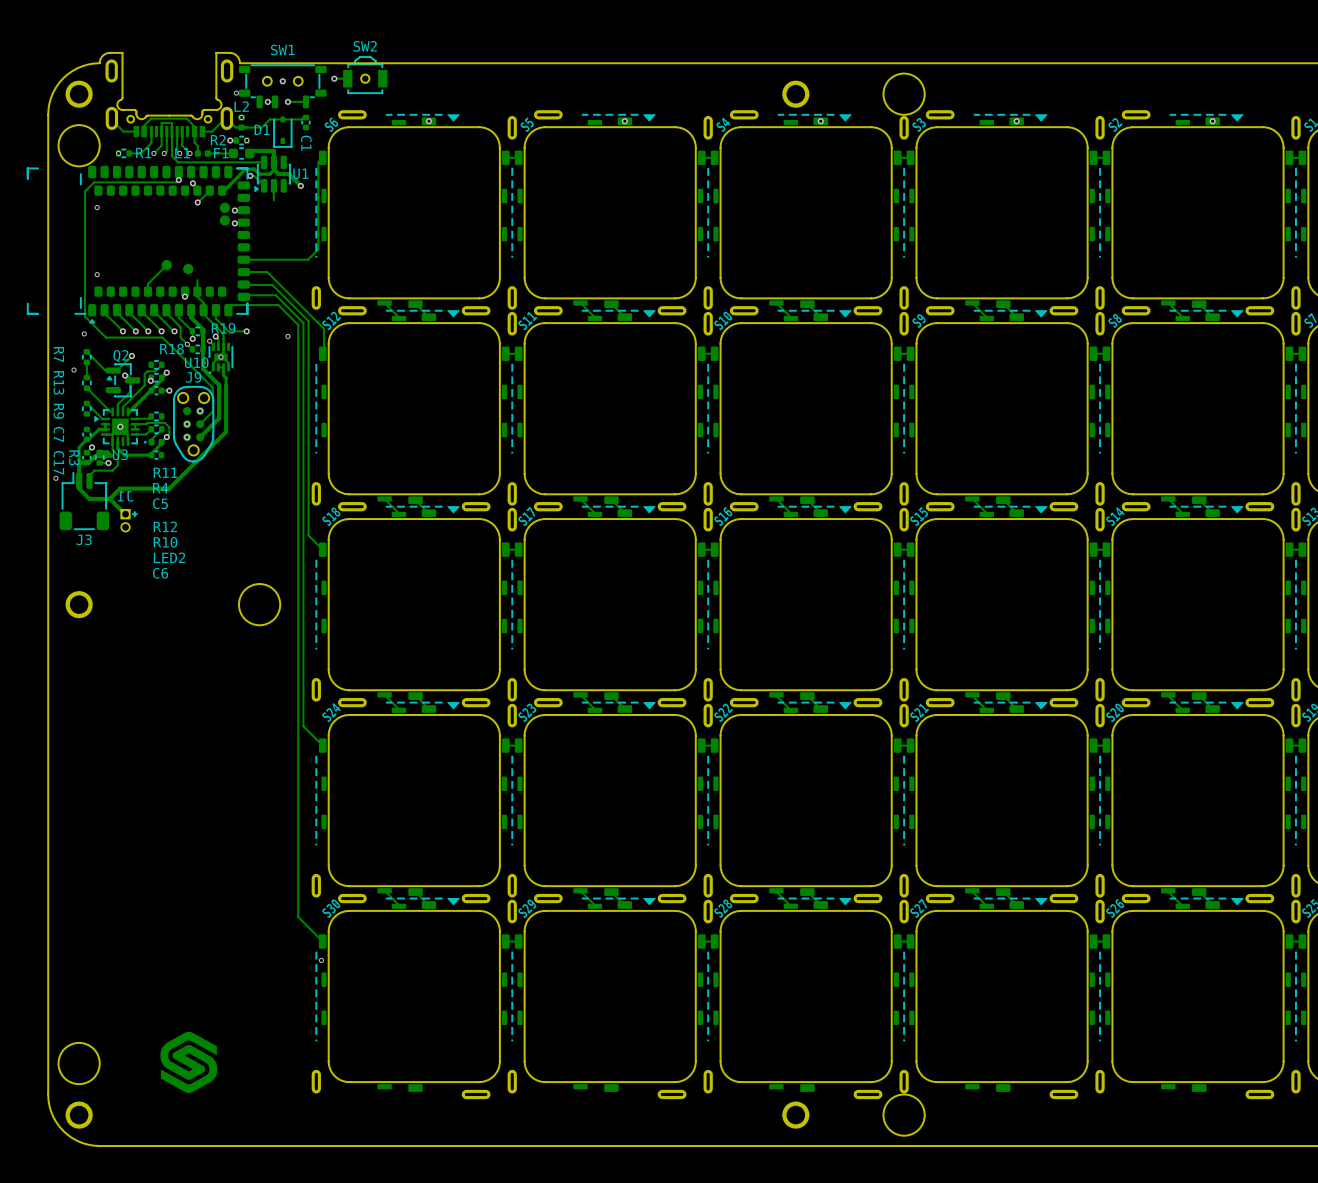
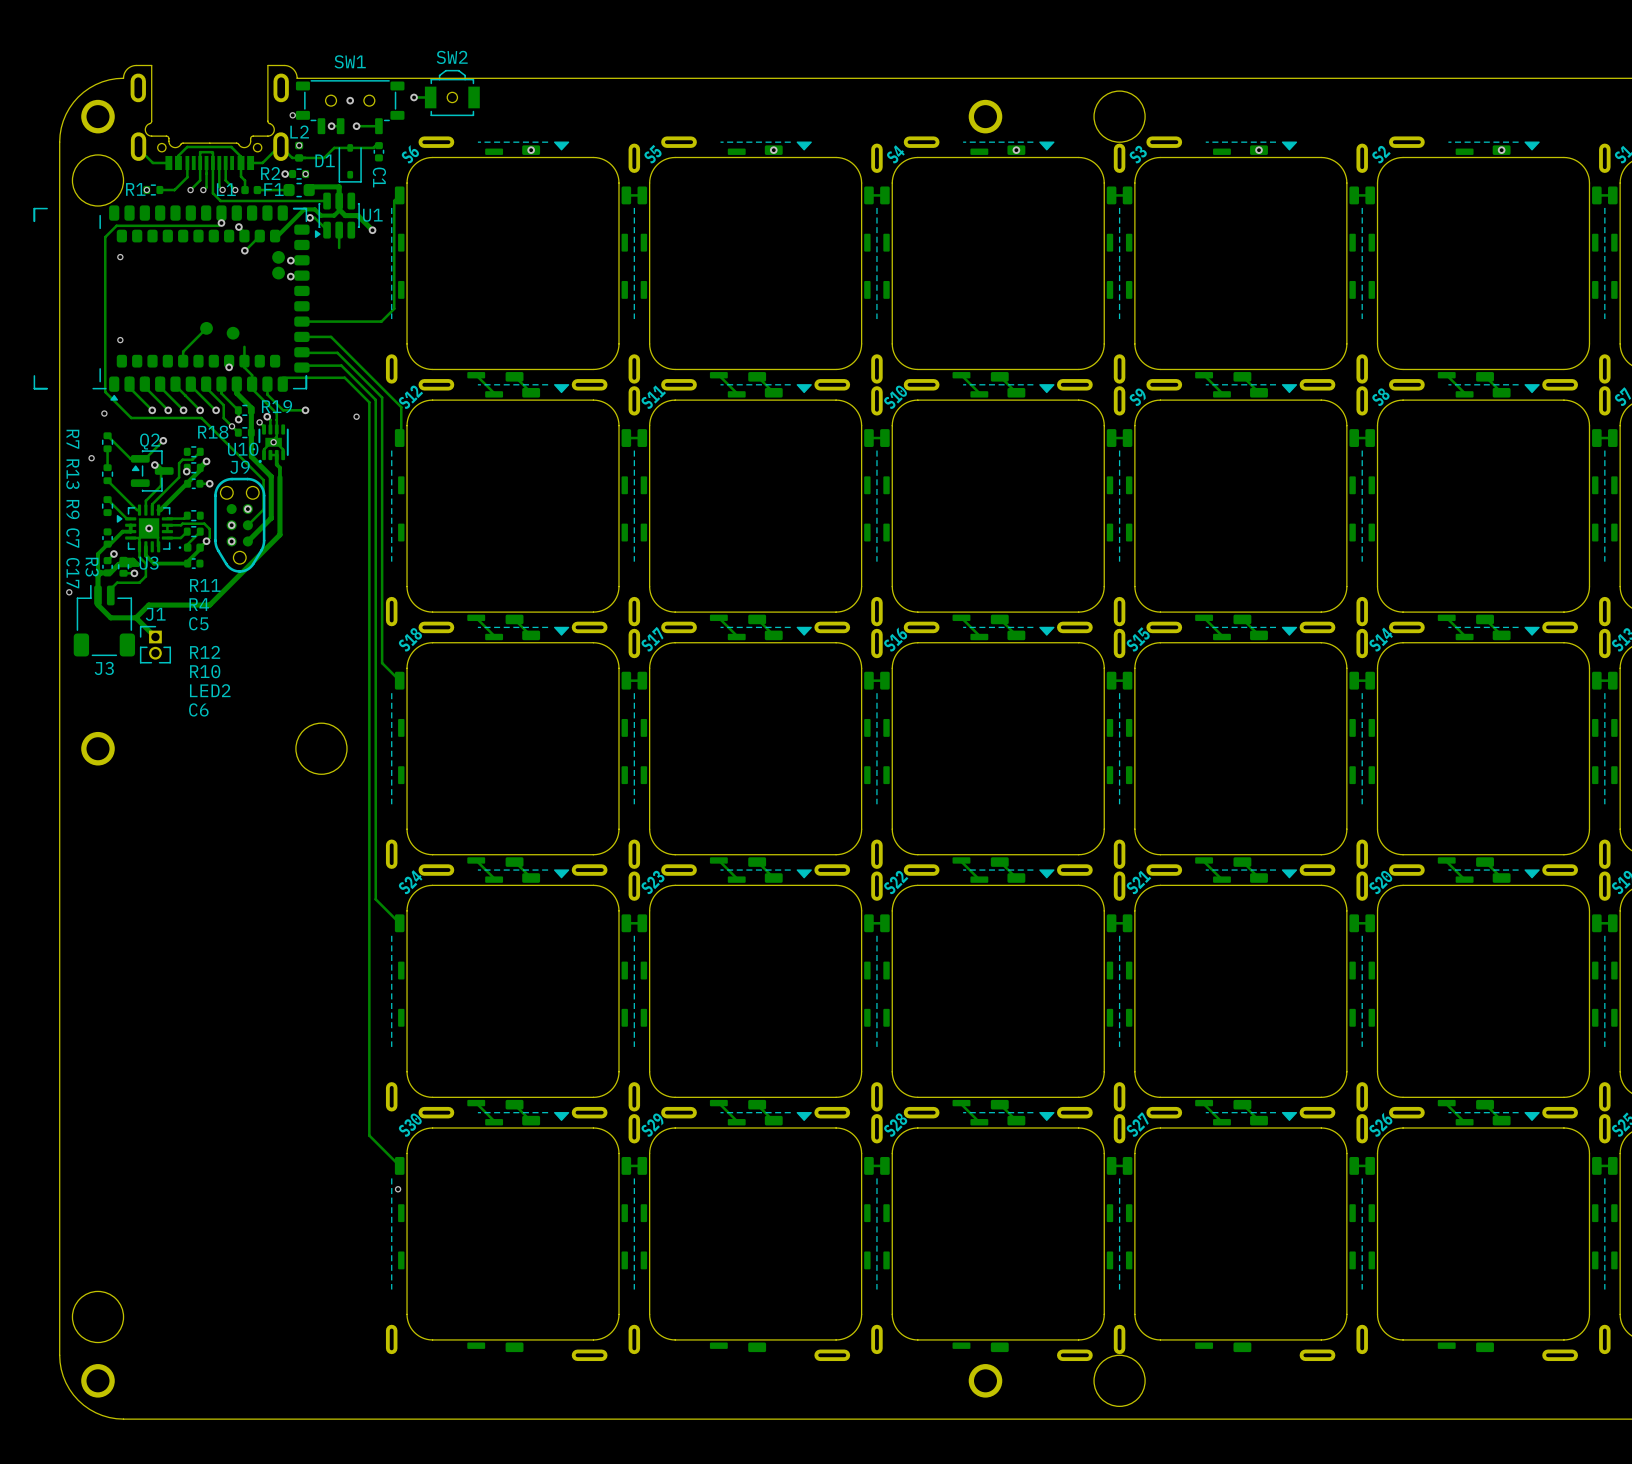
R1 name position: R1 (143, 152) -> R1 (135, 189)
J1 side: top (129, 520) -> bottom (155, 644)
drawing: [160, 1031, 218, 1093] -> none

